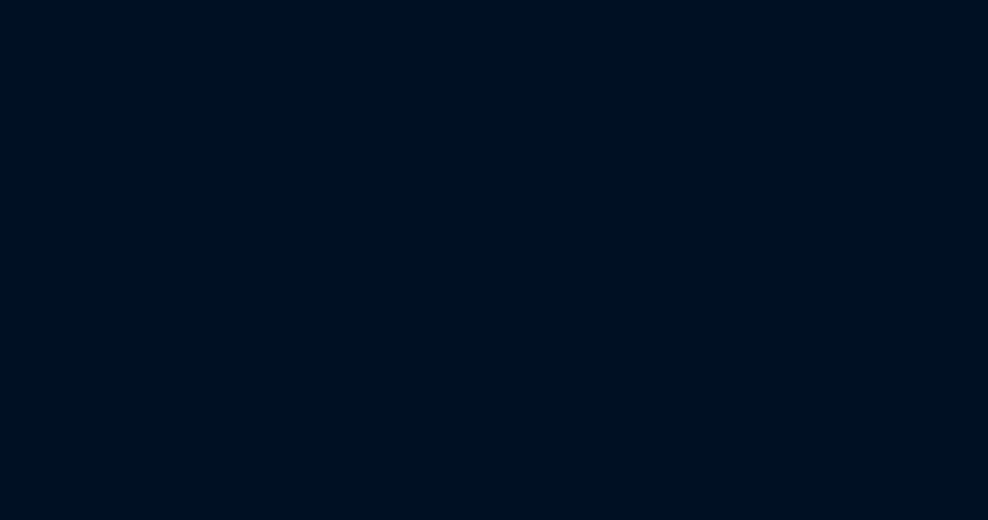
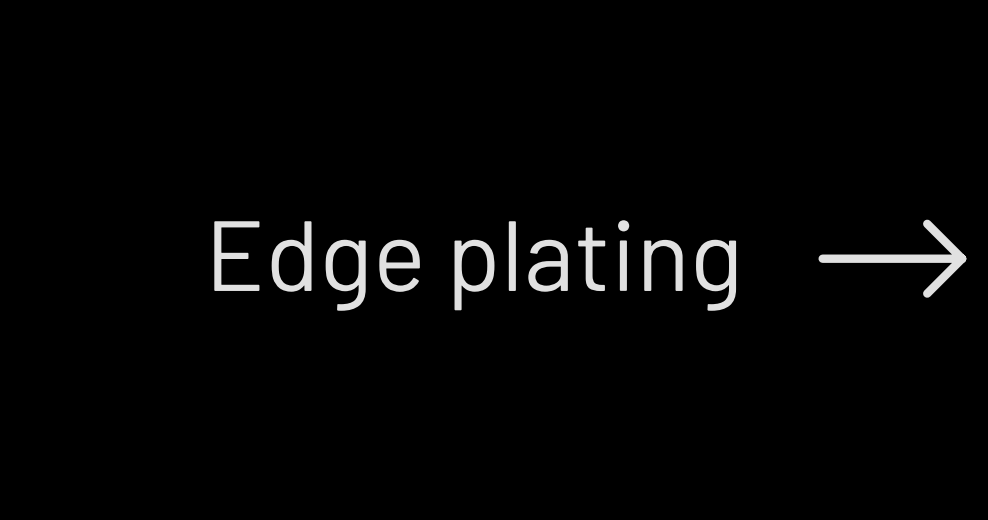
line: none -> (927, 223) (962, 258)
line: none -> (822, 258) (962, 258)
line: none -> (962, 258) (927, 293)
text: none -> Edge plating (475, 265)

